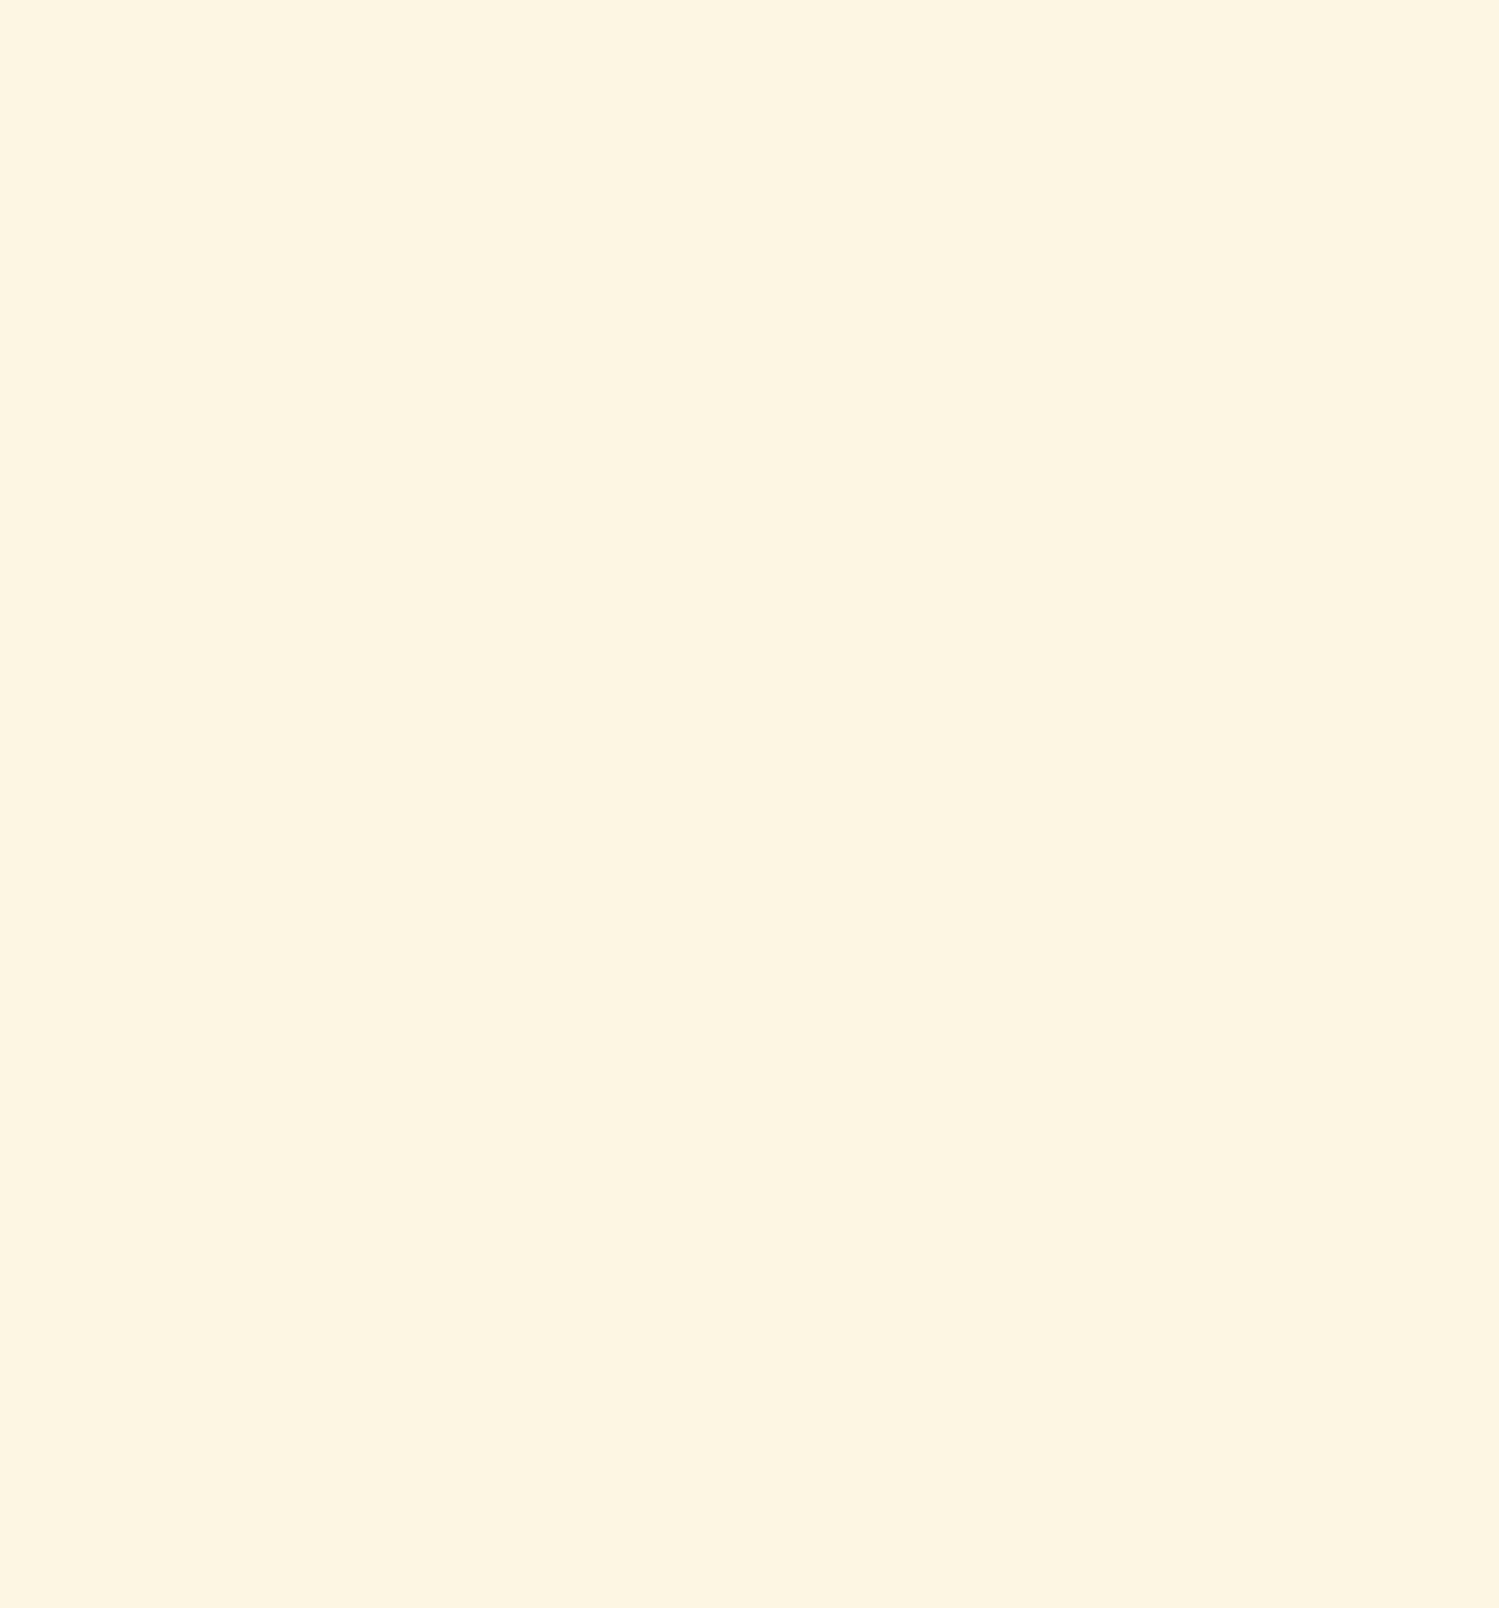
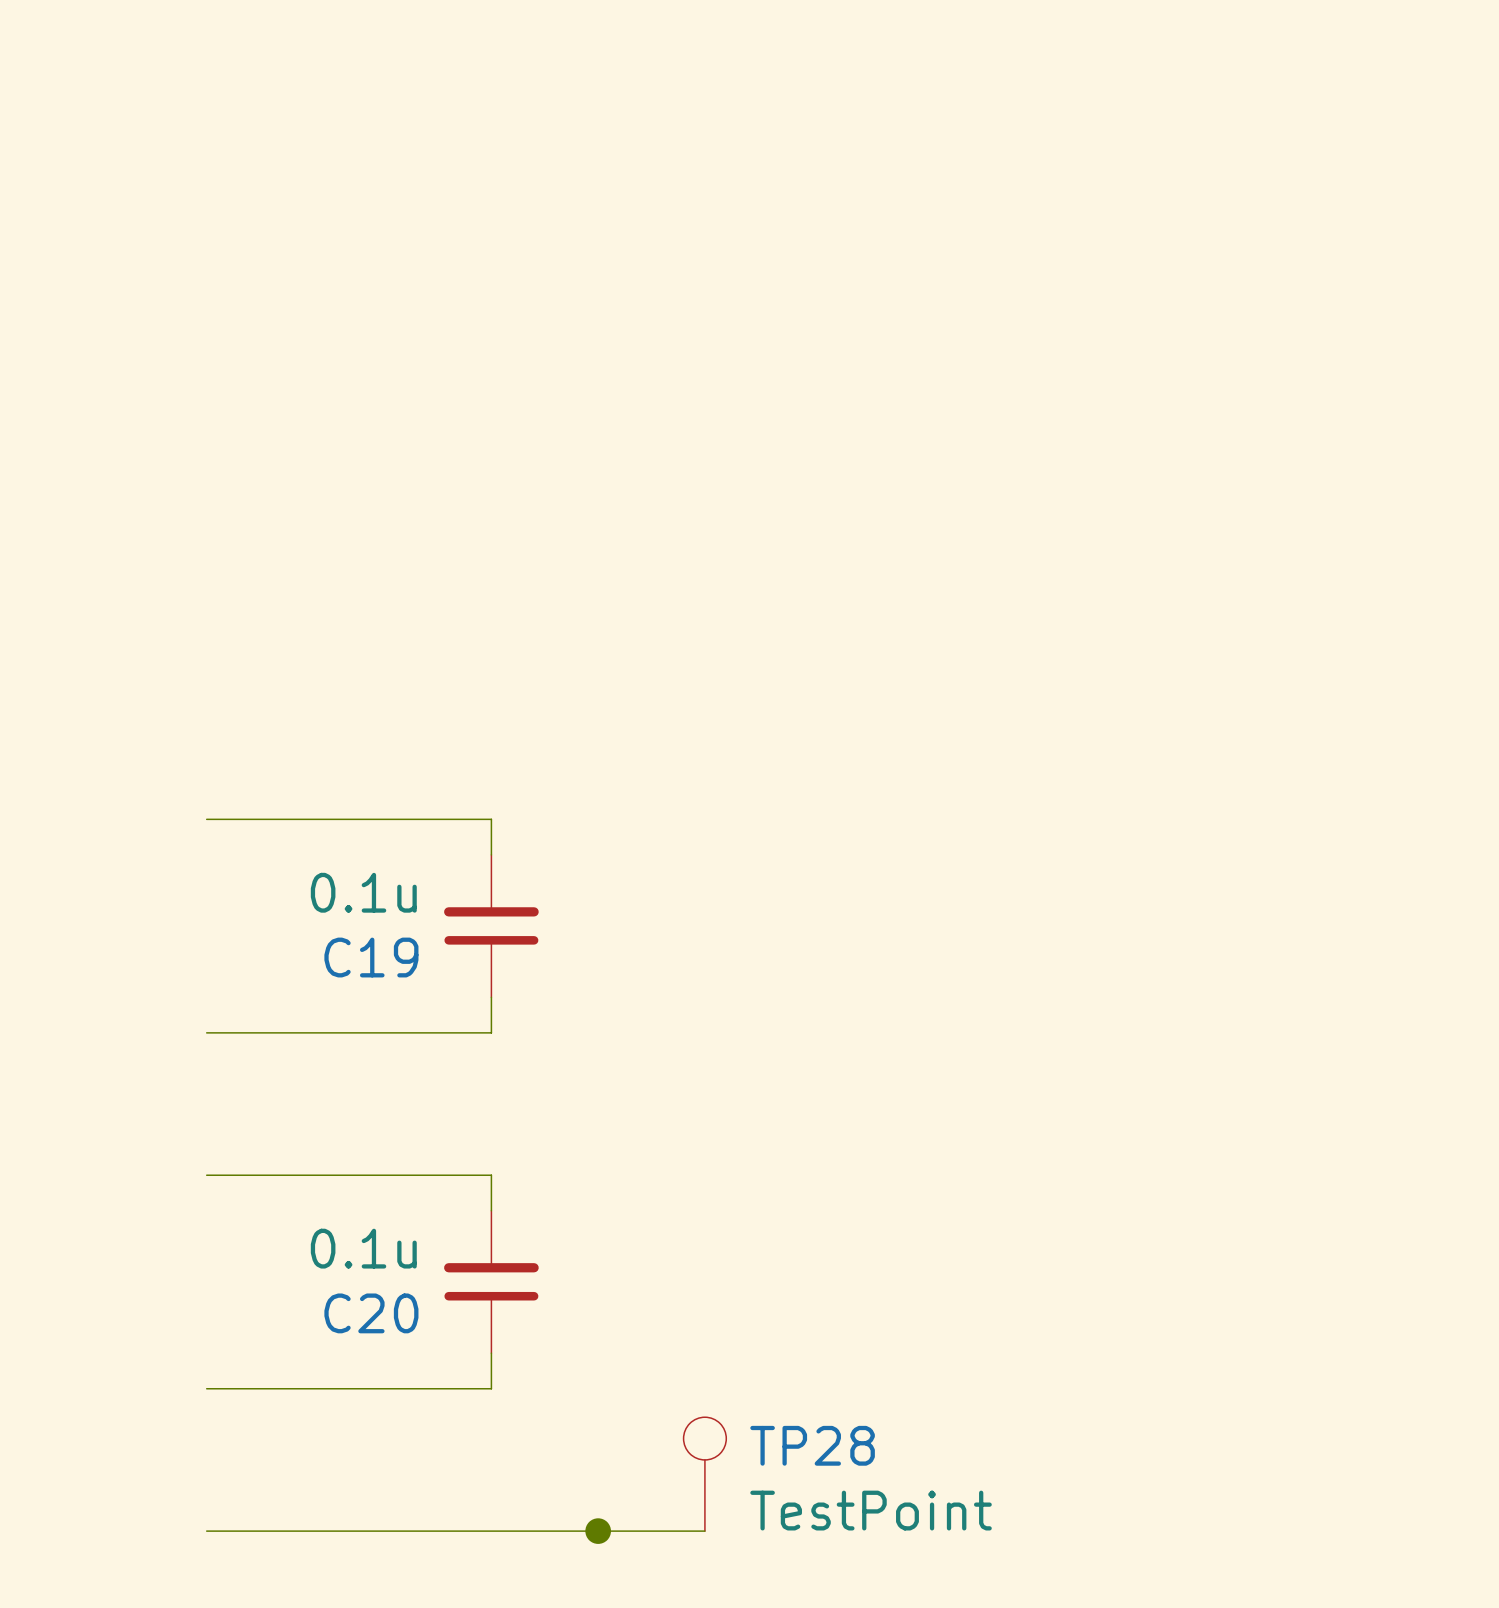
wire: none -> (206, 819) (491, 819) (491, 854)
C19: none -> 0.1u (491, 926)
wire: none -> (491, 997) (491, 1032) (206, 1032)
wire: none -> (206, 1175) (491, 1175) (491, 1210)
C20: none -> 0.1u (491, 1281)
wire: none -> (491, 1353) (491, 1388) (206, 1388)
TP28: none -> TestPoint (704, 1474)
wire: none -> (206, 1531) (704, 1531)
junction: none -> (598, 1531)

